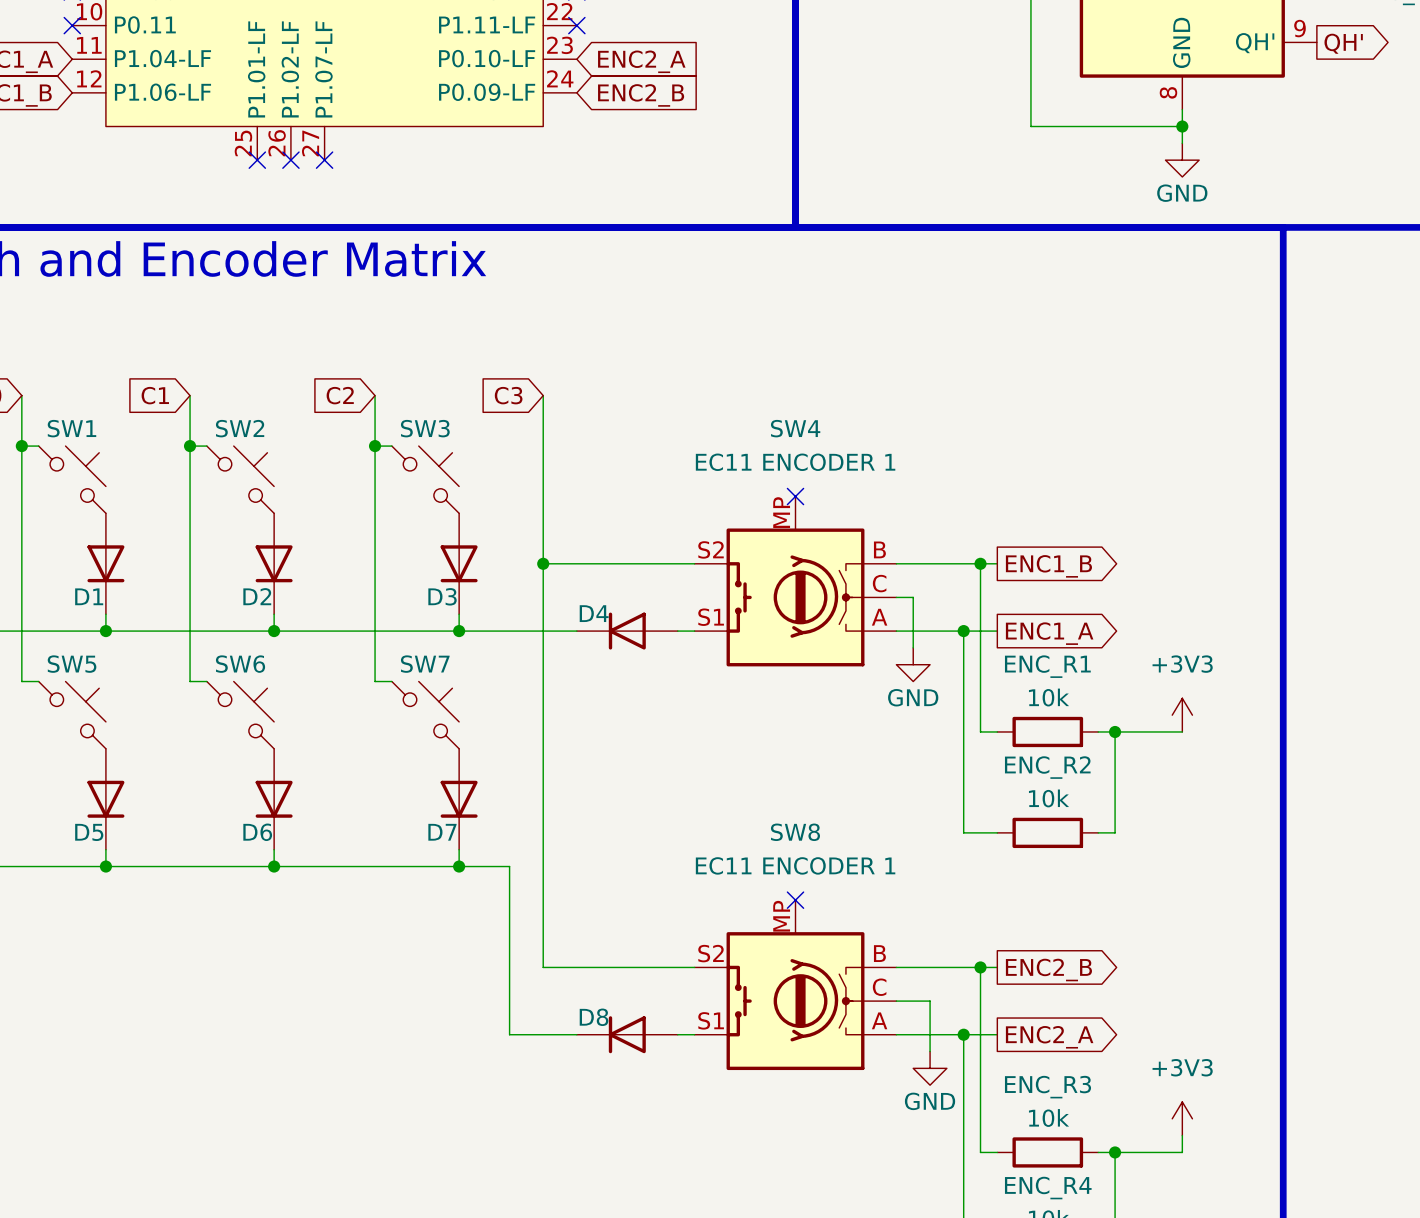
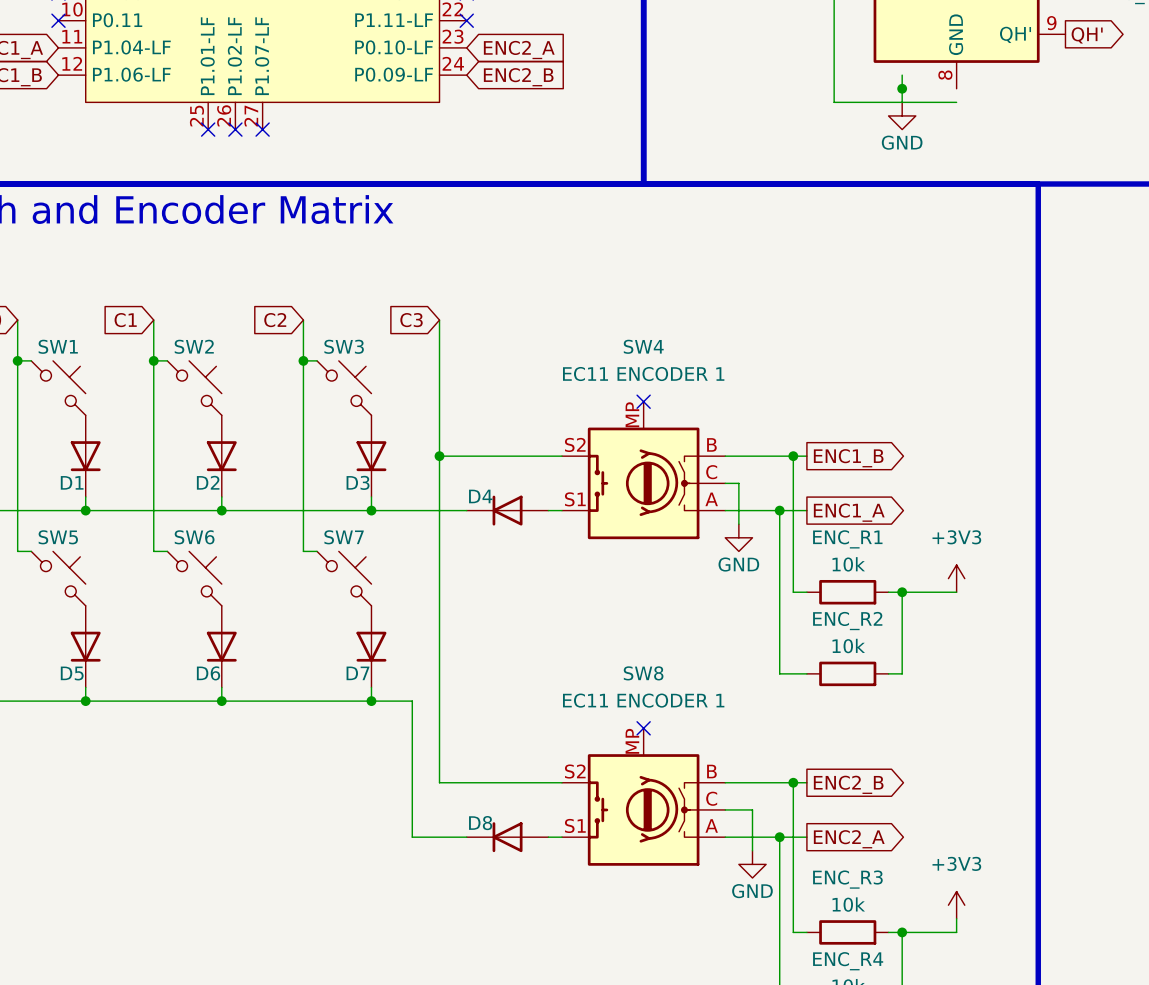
wire: (1182, 109) (1182, 143) -> (902, 75) (902, 102)
junction position: (1182, 126) -> (902, 88)
power symbol position: GND (1182, 160) -> GND (902, 115)

